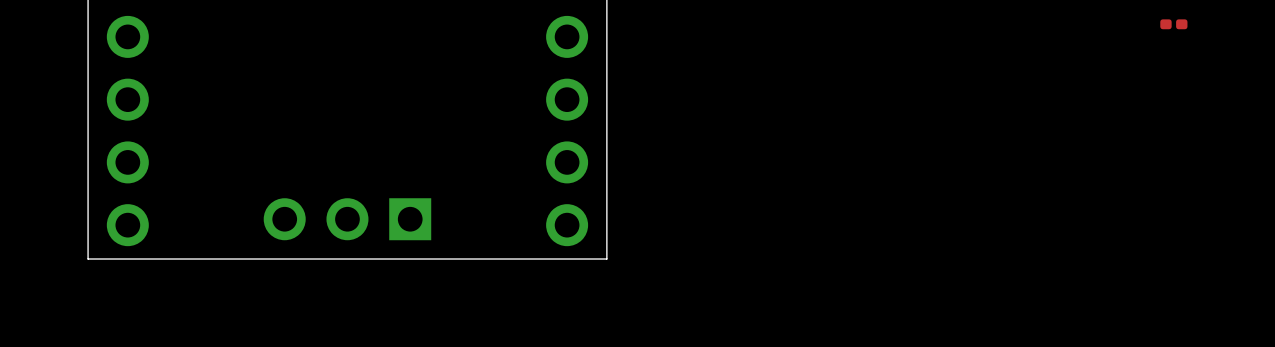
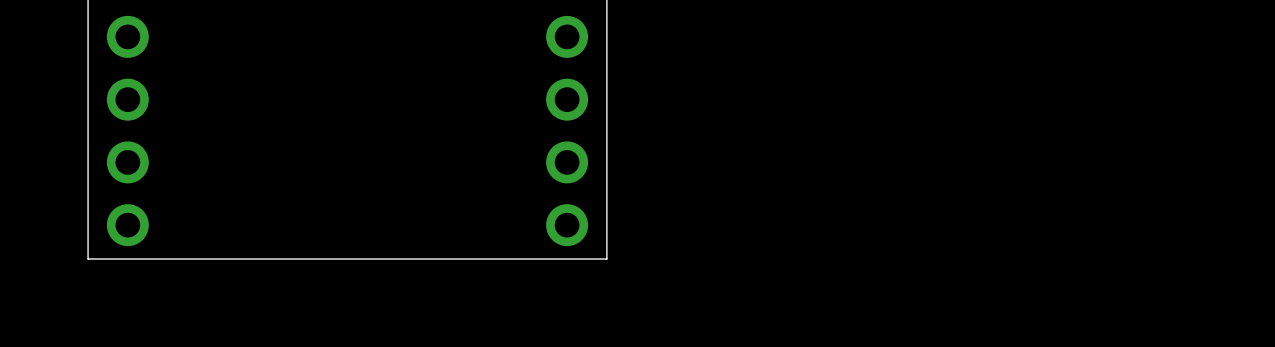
part: (1173, 24) -> none
part: (347, 219) -> none

